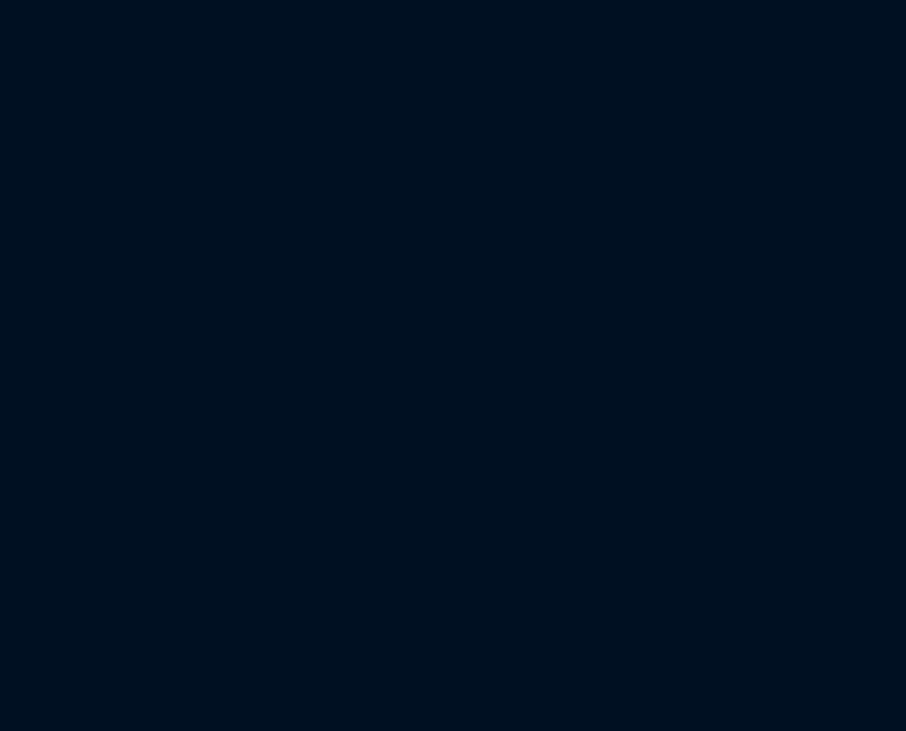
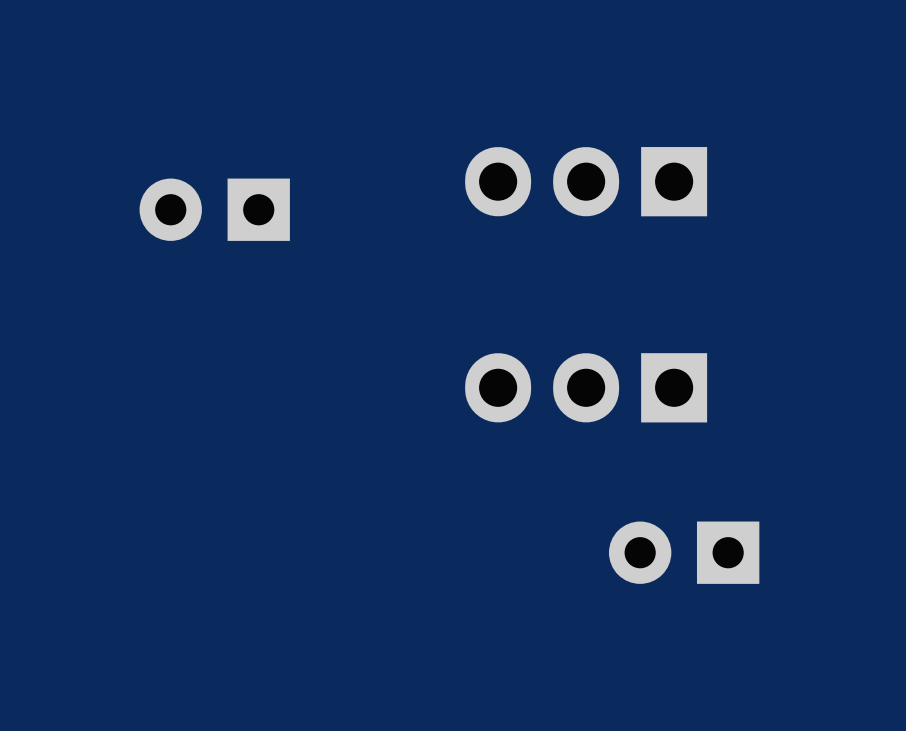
part: none -> (586, 181)
part: none -> (214, 209)
part: none -> (586, 387)
part: none -> (684, 552)

